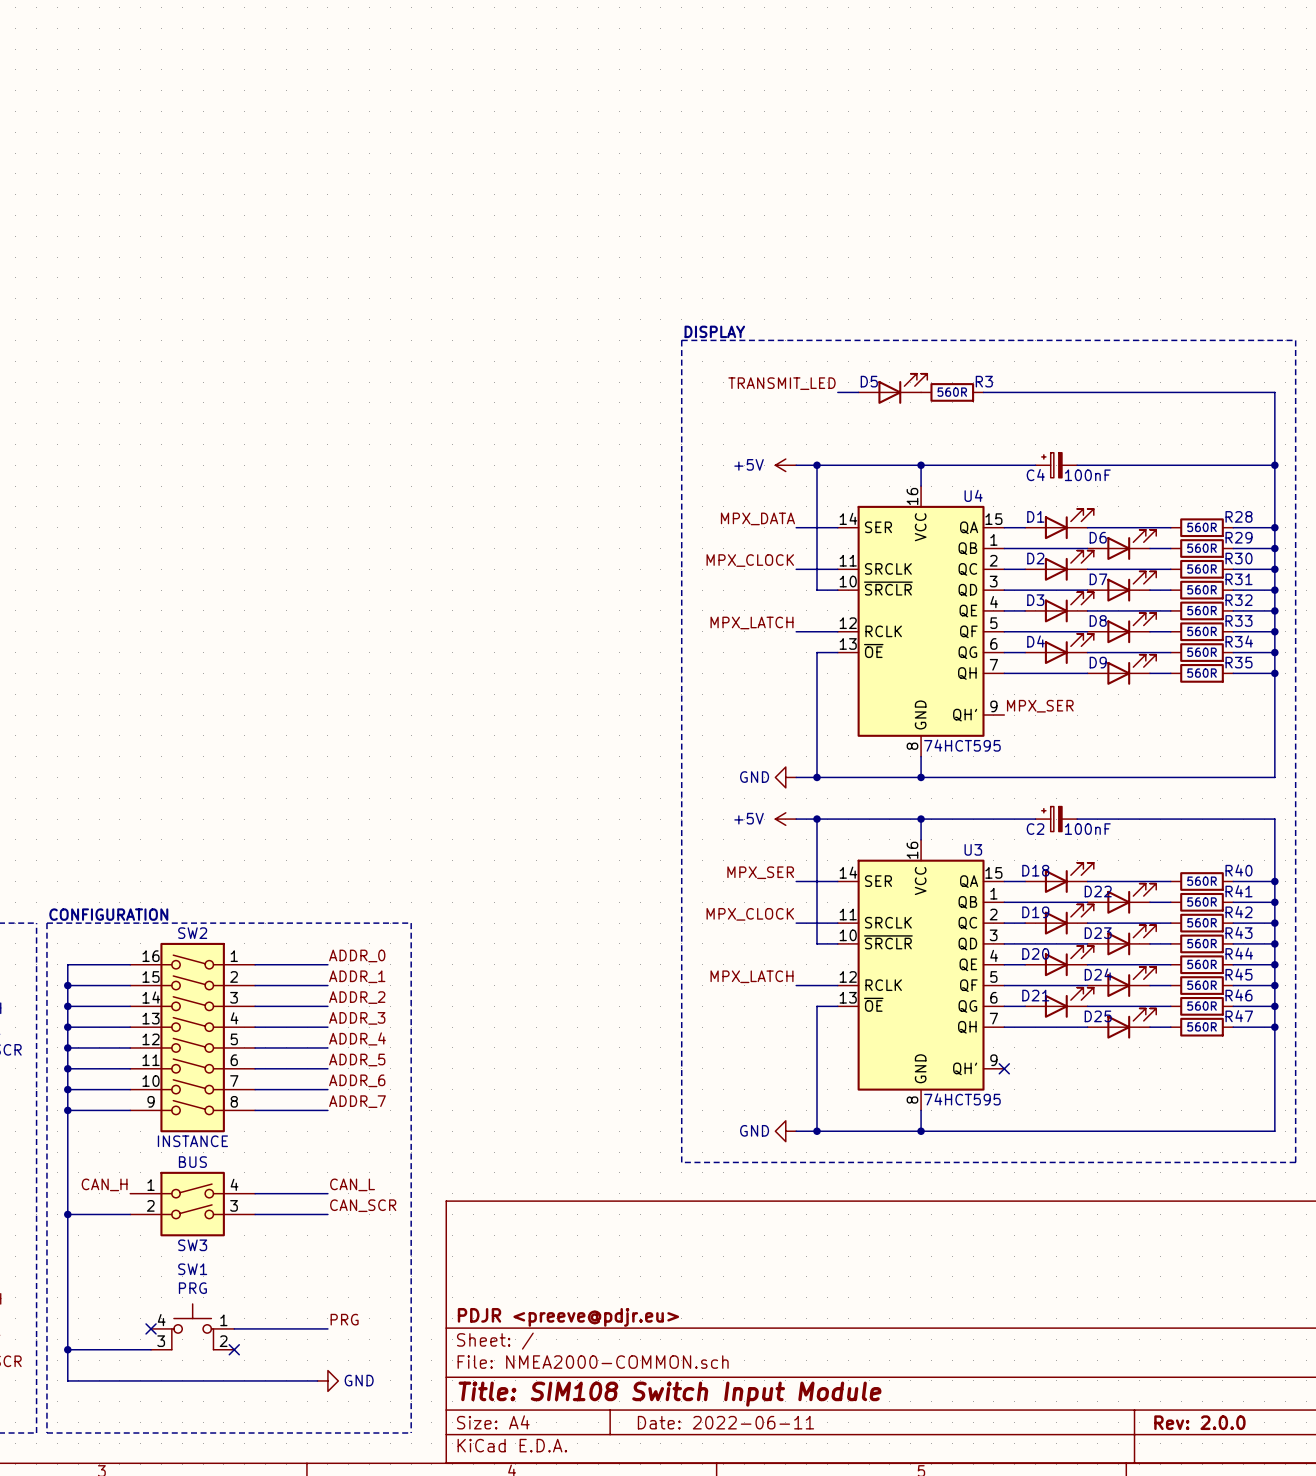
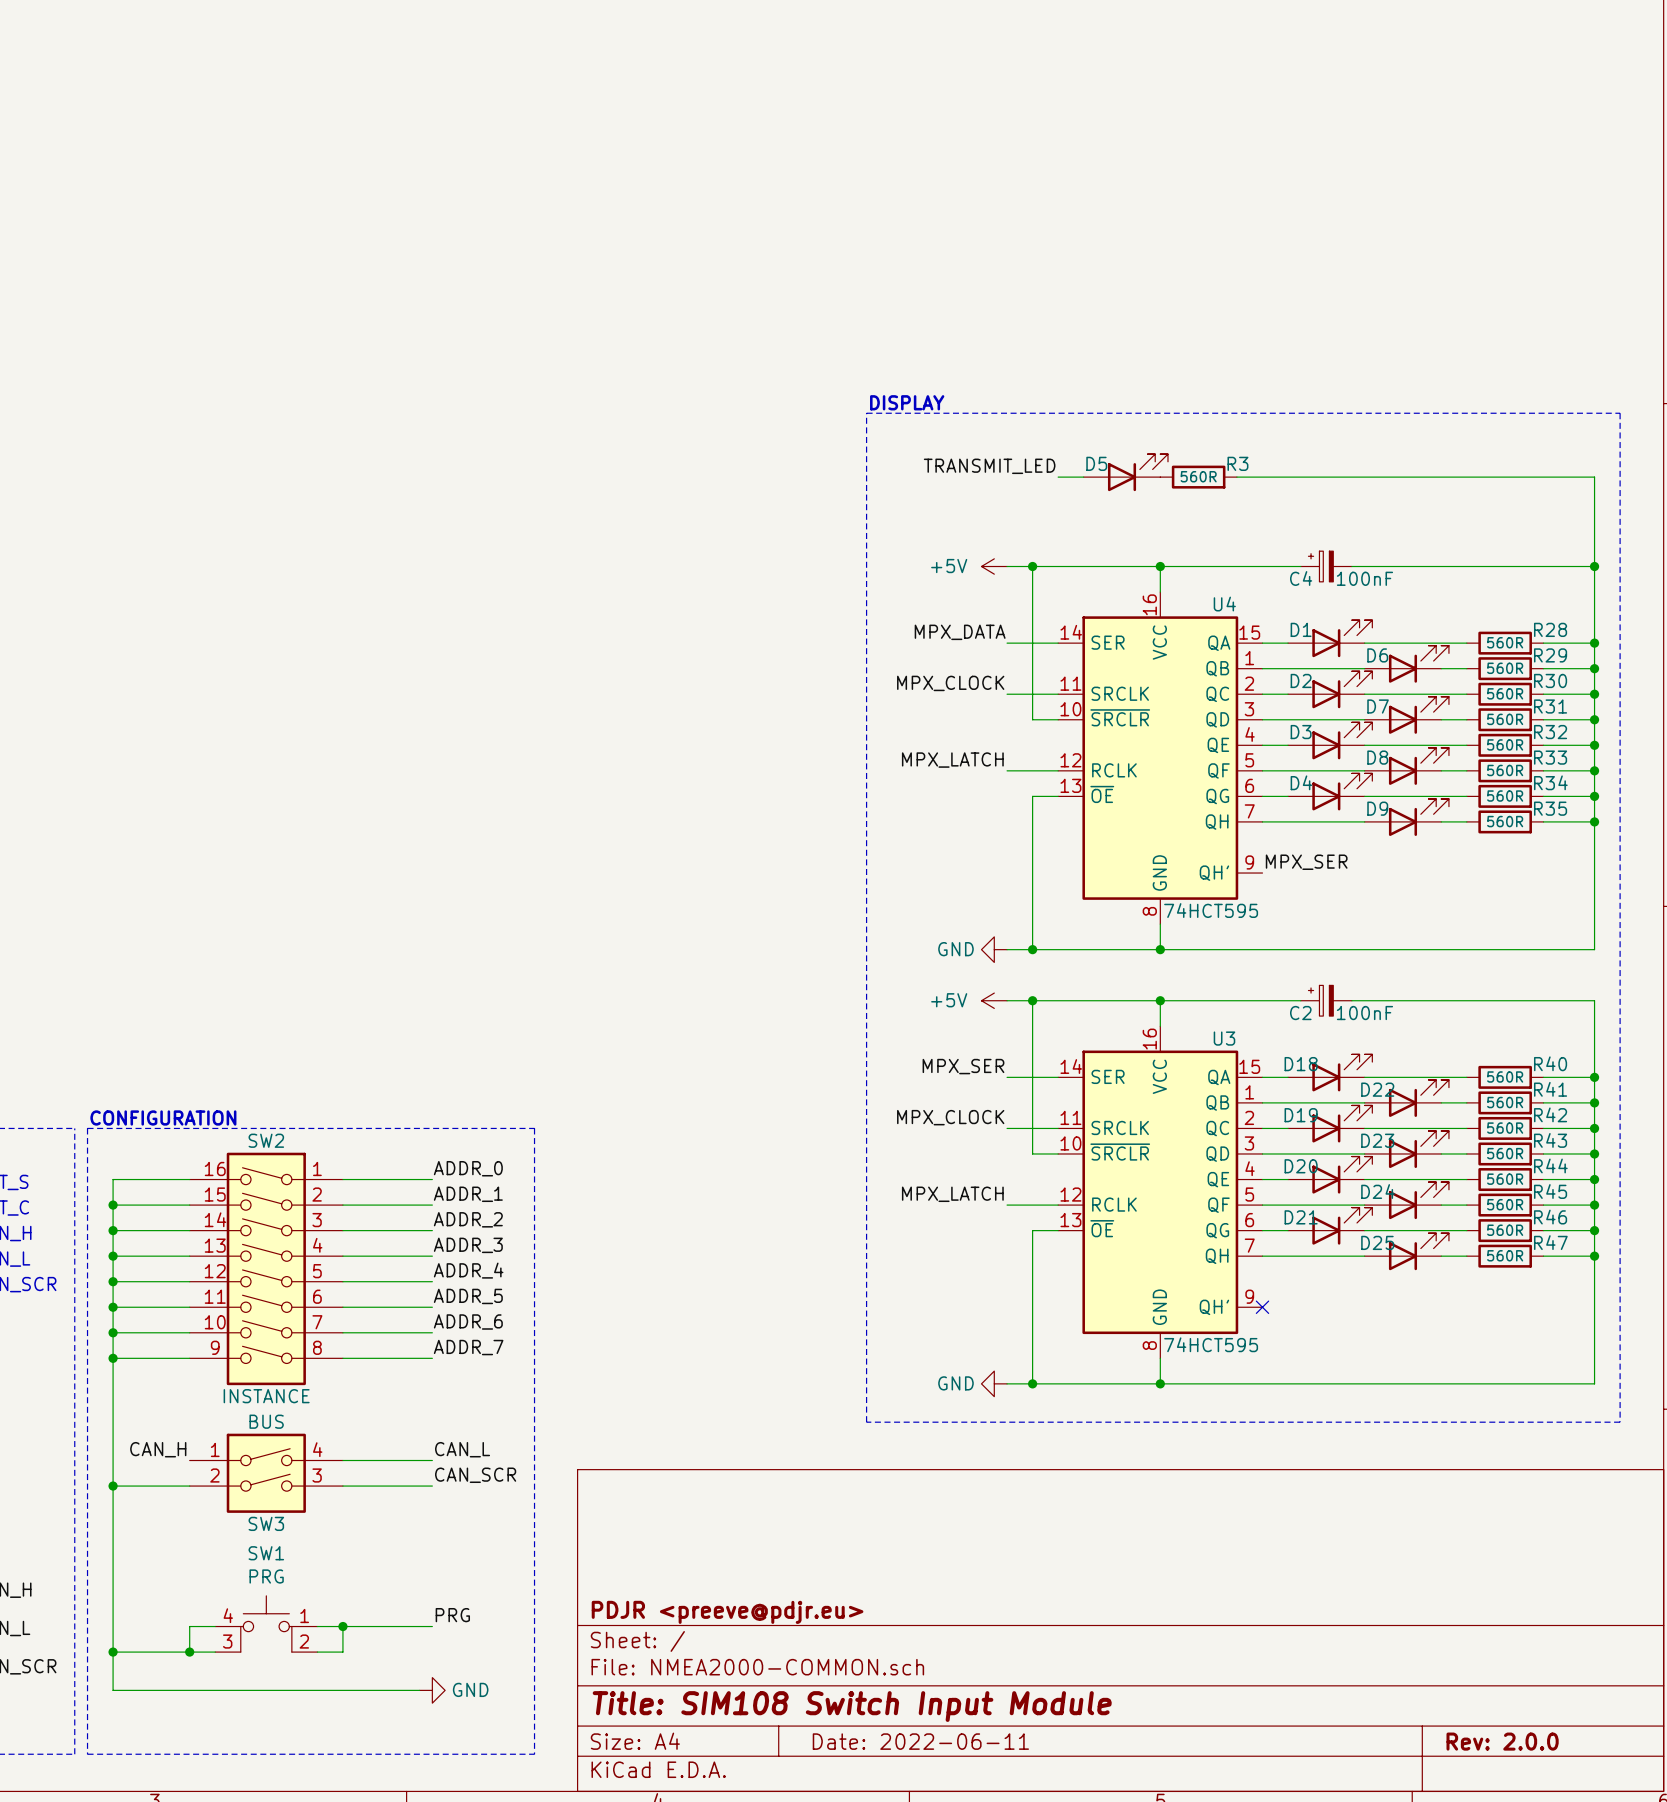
wire: none -> (215, 1626) (189, 1626) (189, 1652)
no-connect mark: (151, 1328) -> none
wire: none -> (342, 1626) (342, 1652) (317, 1652)
junction: none -> (342, 1626)
junction: none -> (189, 1652)
no-connect mark: (234, 1349) -> none

